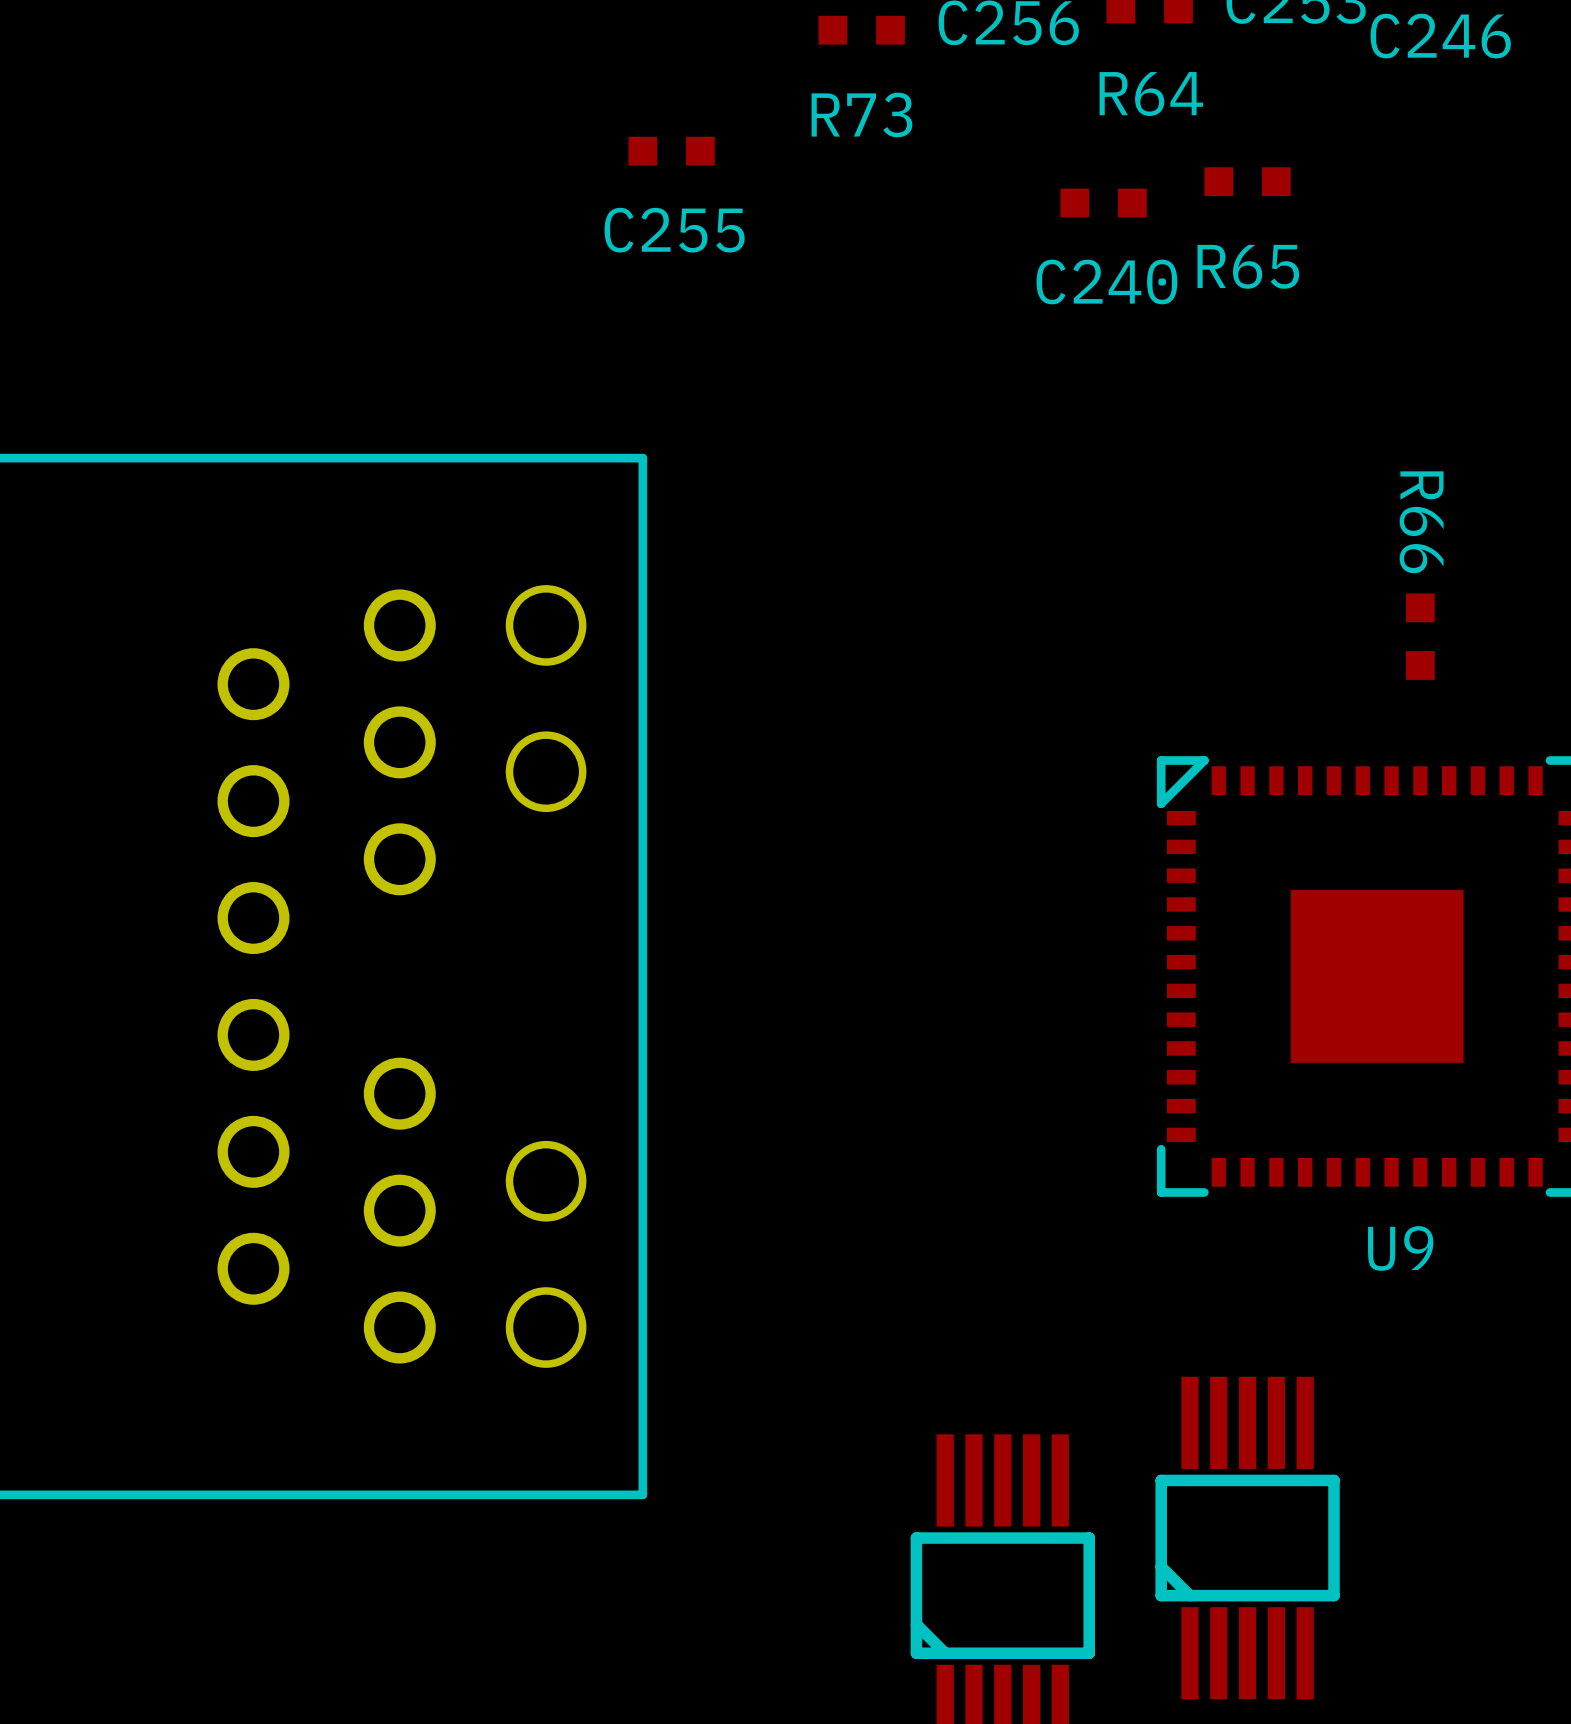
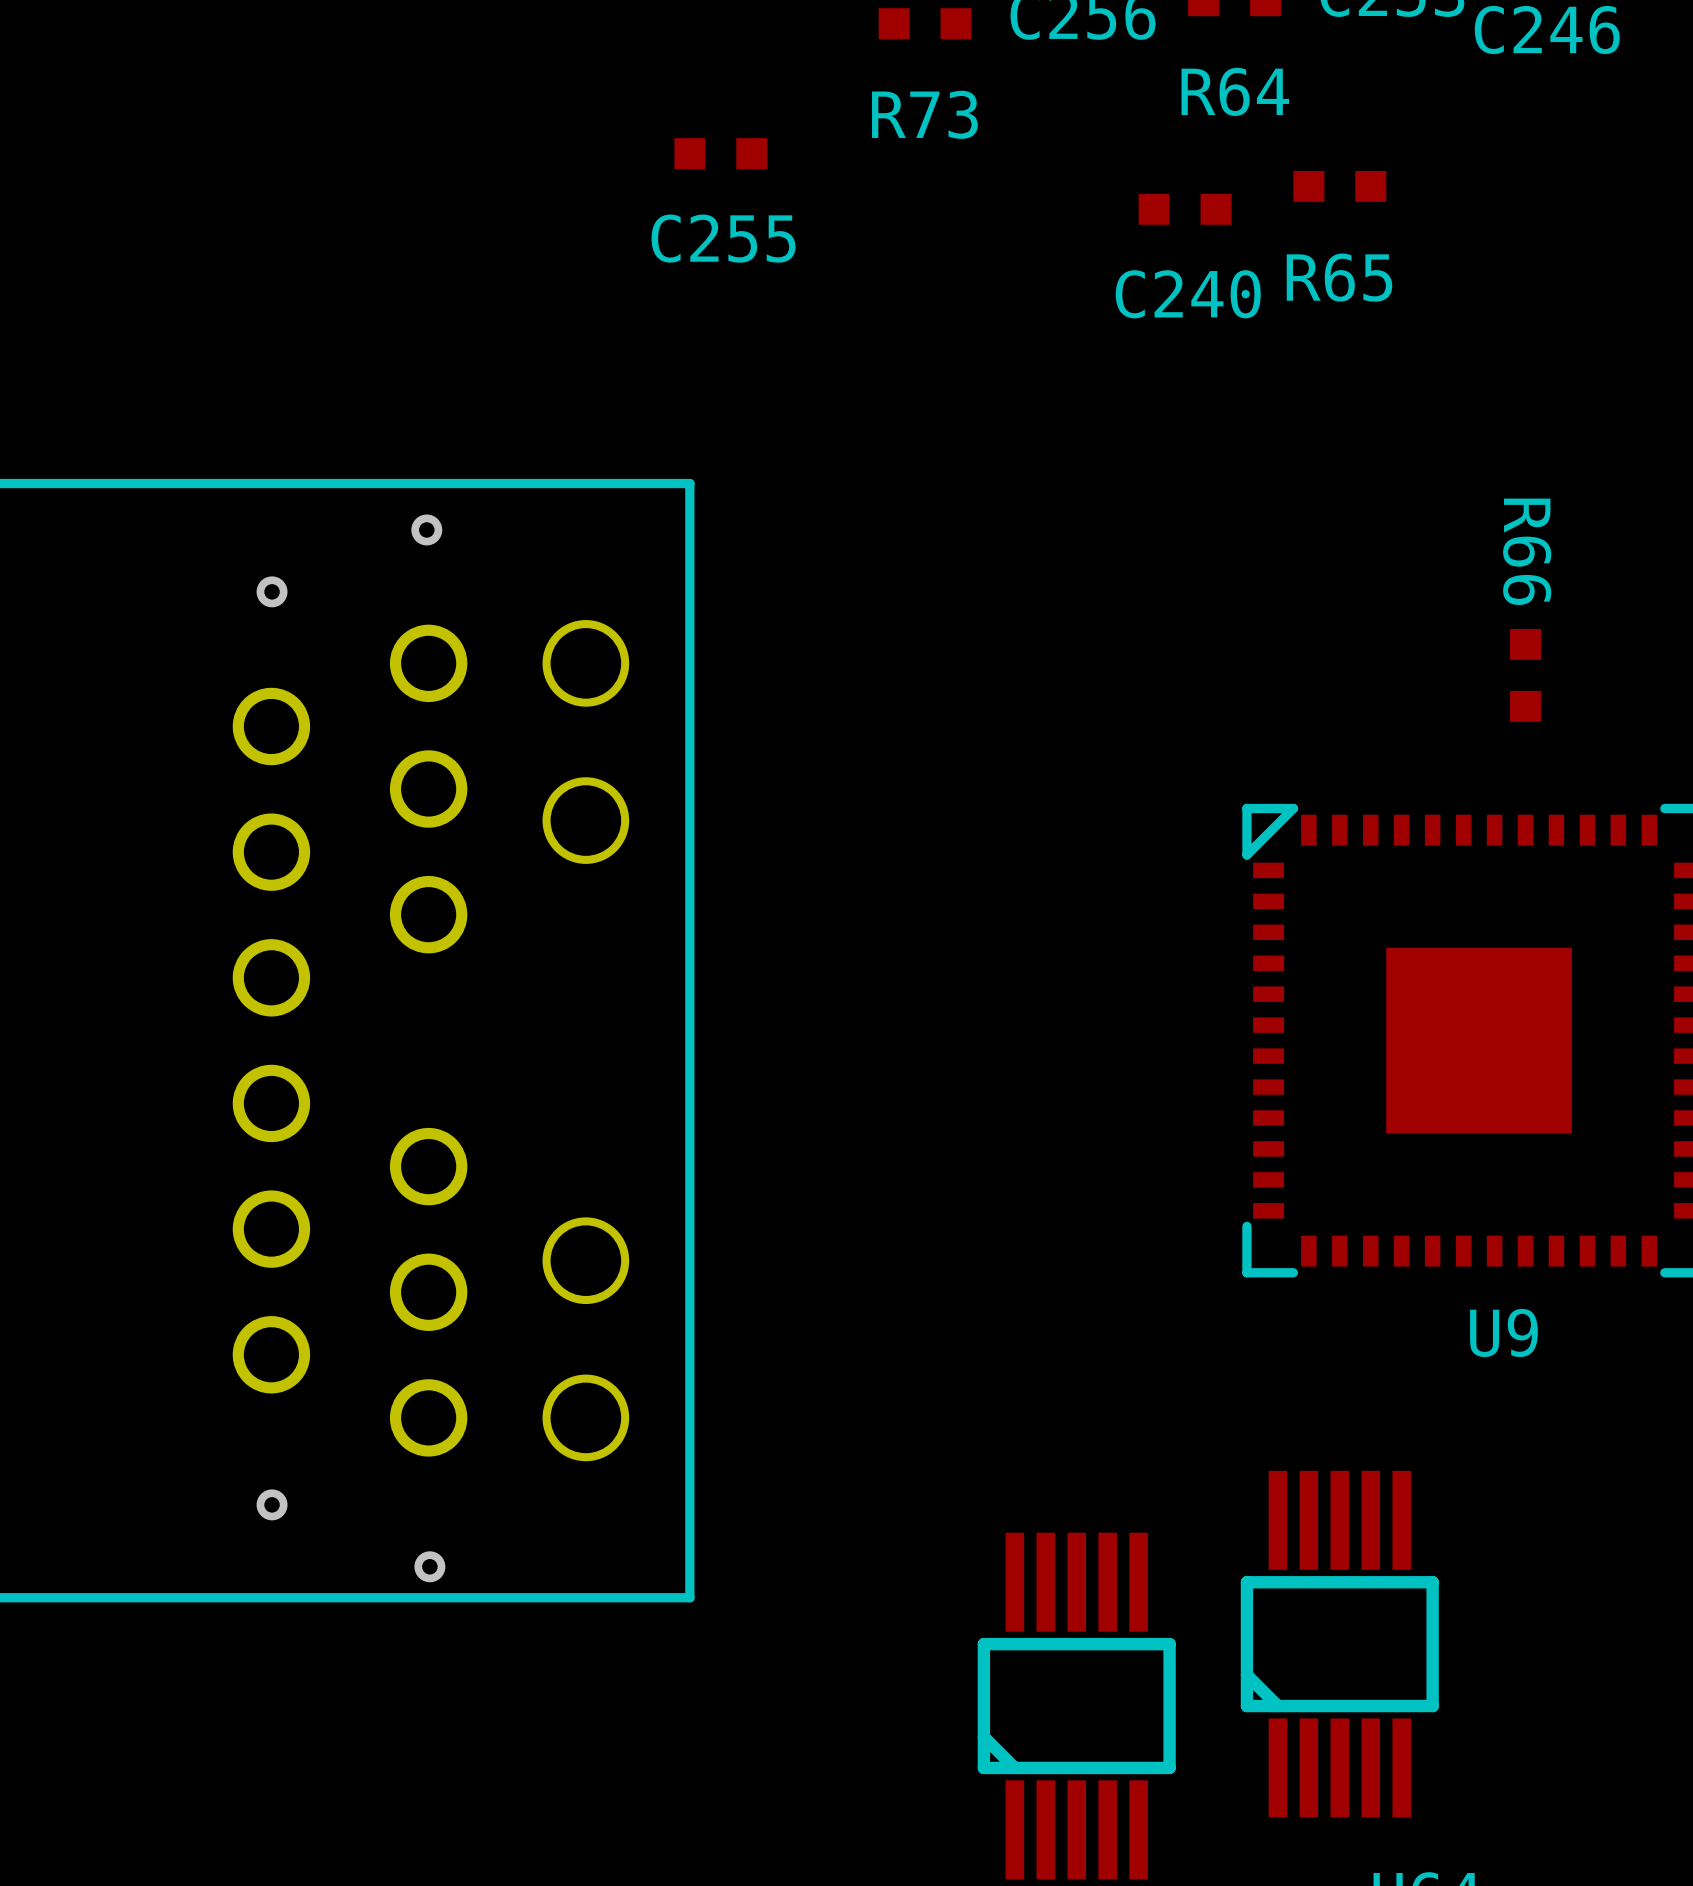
via: none -> (426, 529)
via: none -> (272, 591)
via: none -> (272, 1504)
via: none -> (429, 1566)

